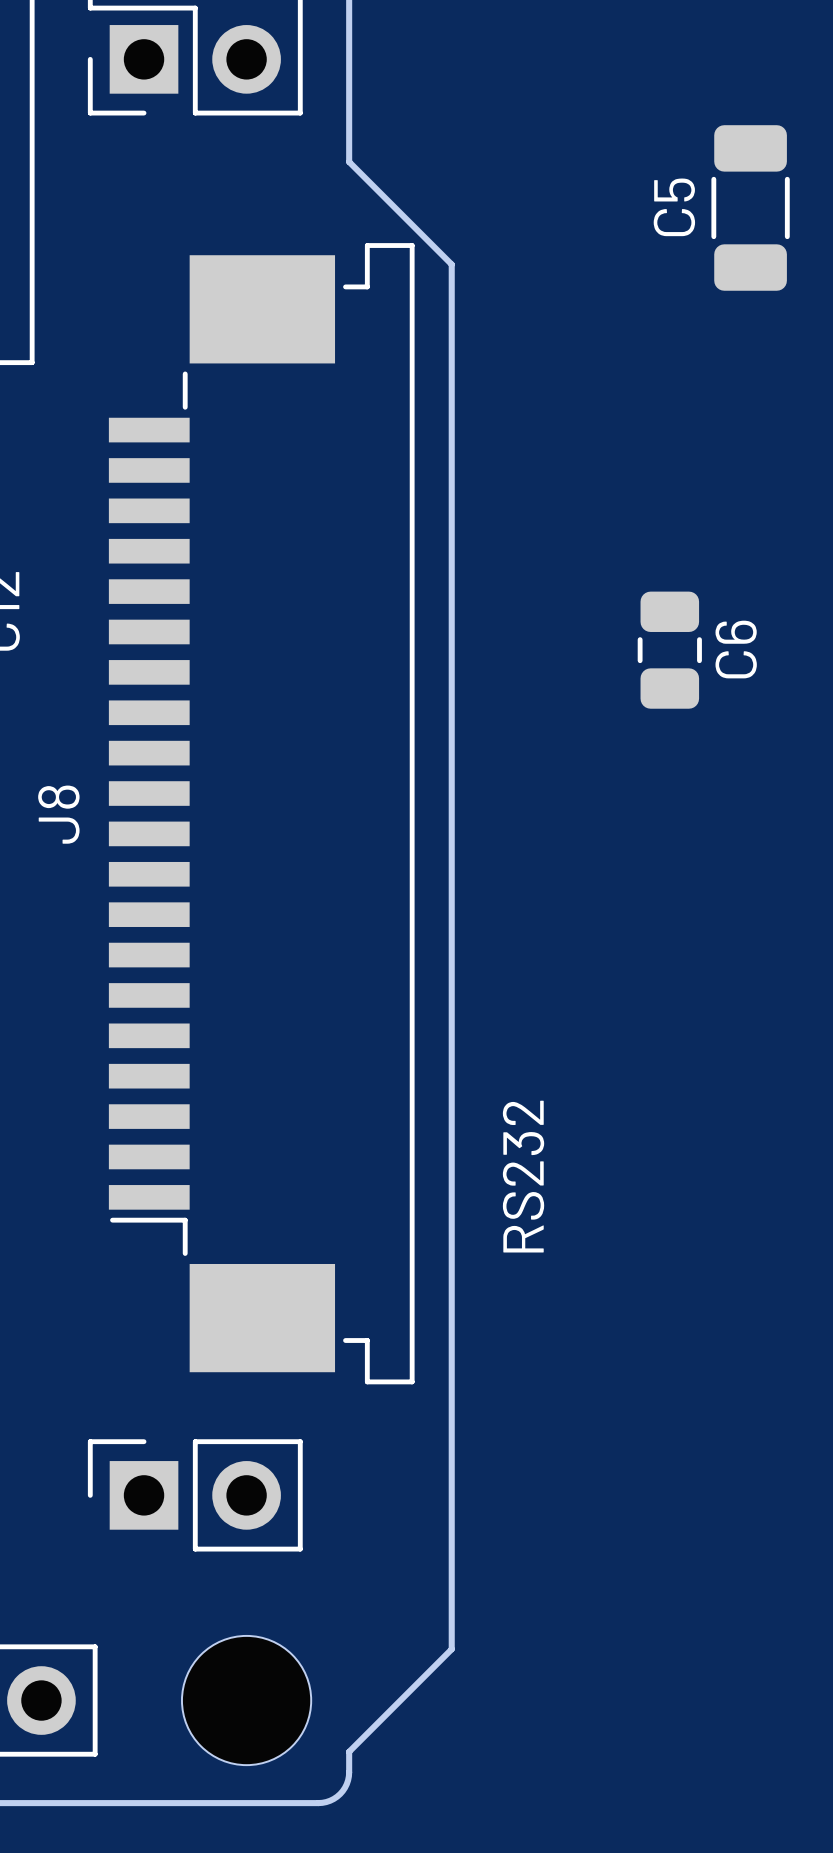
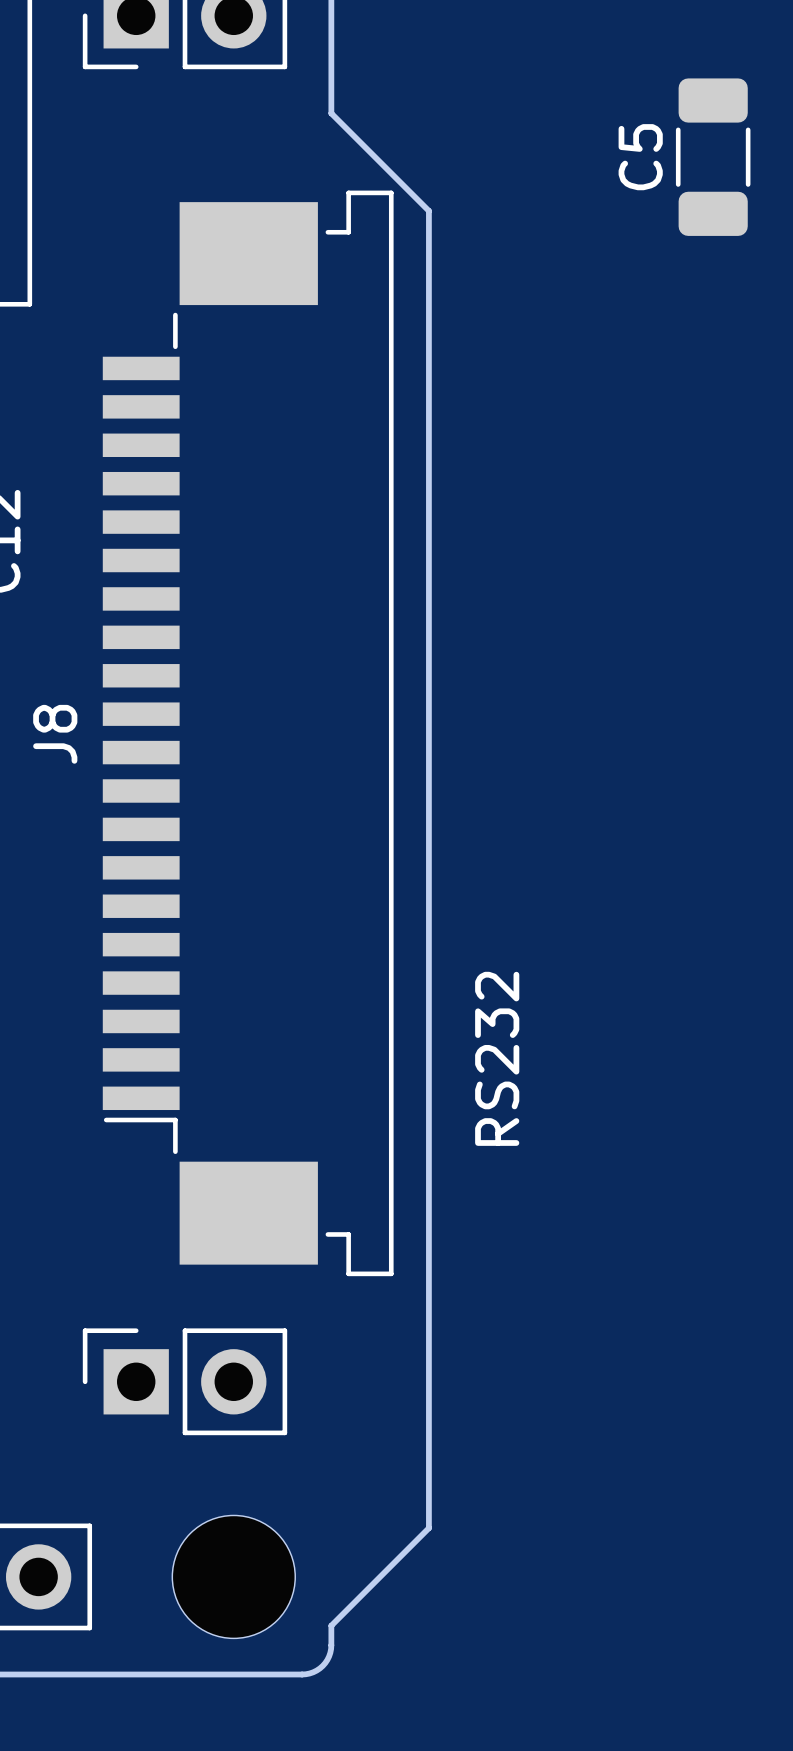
C6: (669, 650) -> none

